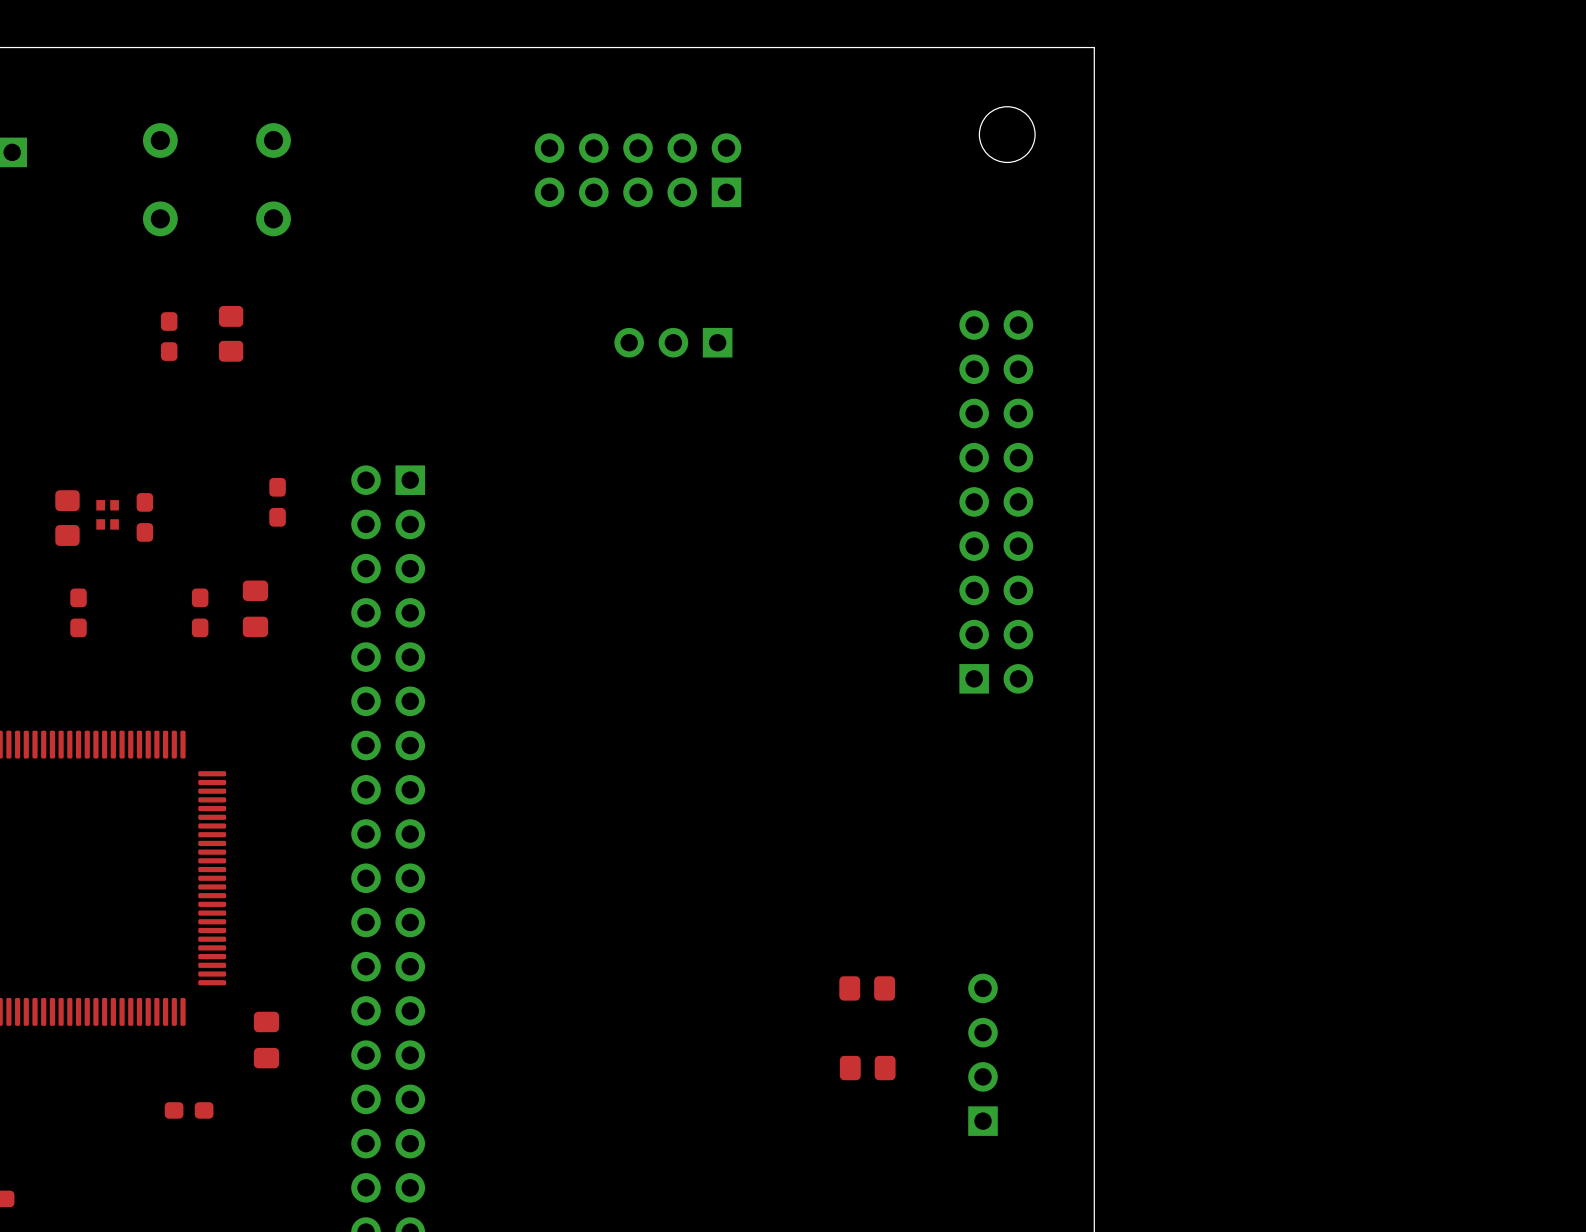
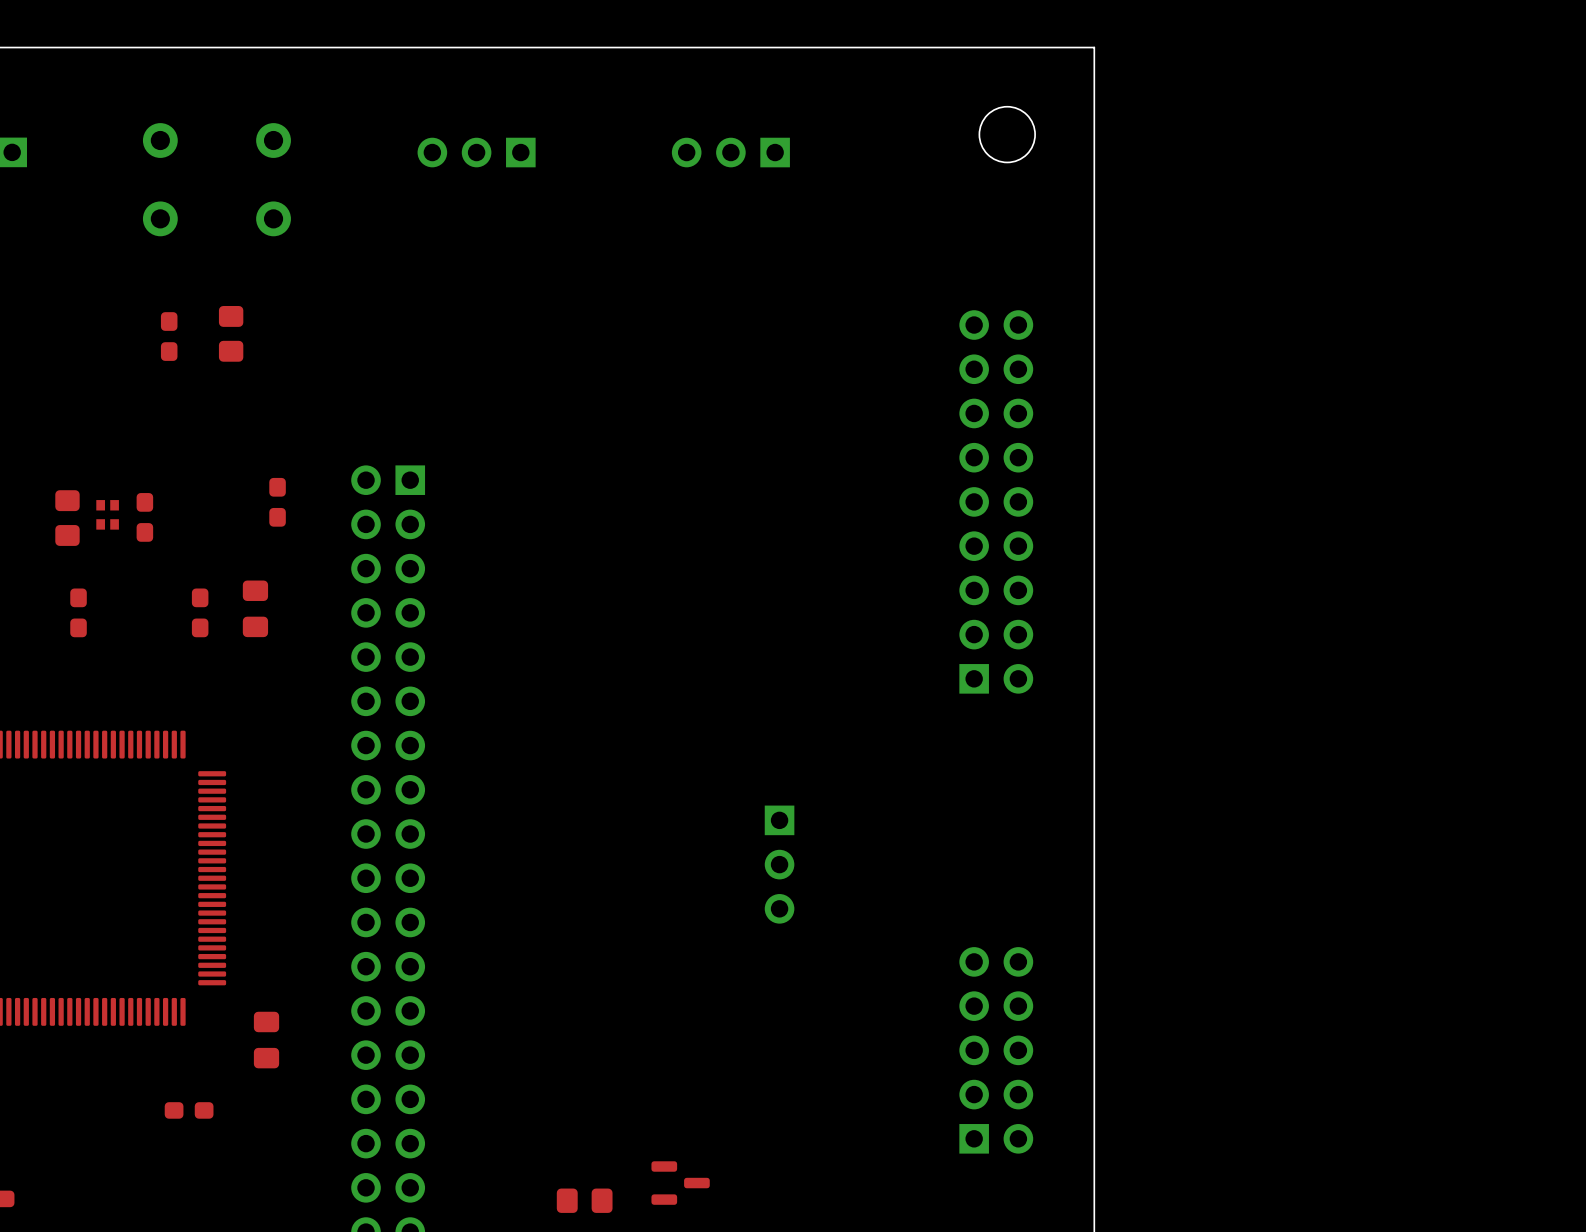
part: none -> (476, 152)
part: none -> (730, 152)
part: (638, 170) -> none
part: (673, 342) -> none
part: none -> (779, 864)
part footprint: [968, 973, 998, 1136] -> [959, 947, 1034, 1154]
part: (867, 988) -> none
part: (867, 1068) -> none
part: none -> (680, 1183)
part: none -> (584, 1200)

